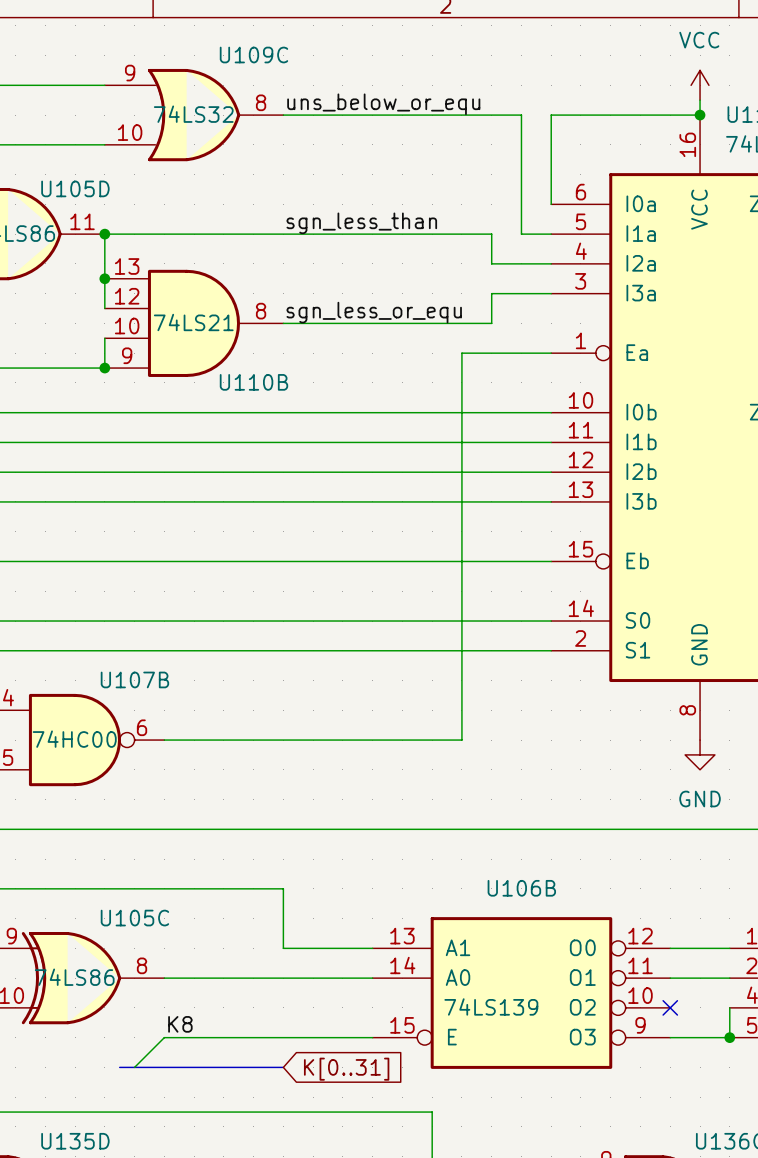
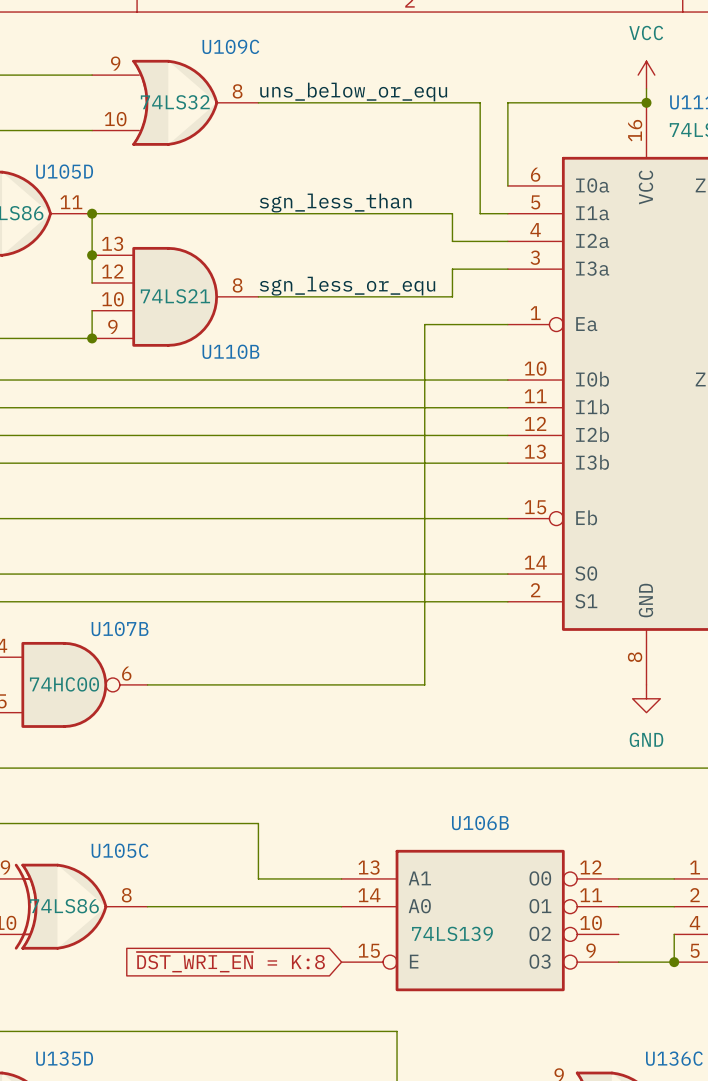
no-connect mark: (670, 1007) -> none
label: K8 (180, 1024) -> none
global label: none -> ~{DST_WRI_EN} = K:8 (230, 962)
wire: (372, 1037) (164, 1037) (134, 1067) -> none
bus: (119, 1067) (283, 1067) -> none
global label: K[0..31] (346, 1069) -> none

